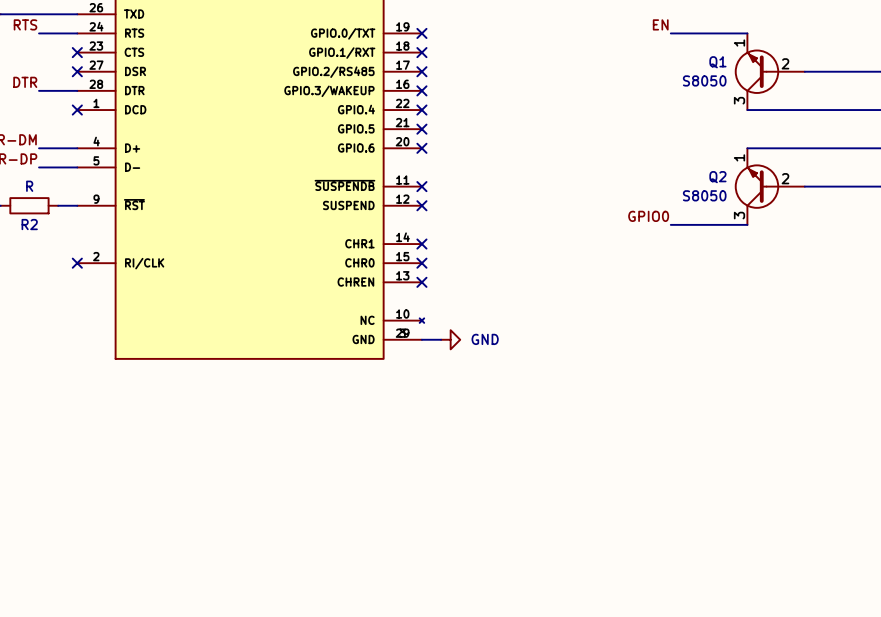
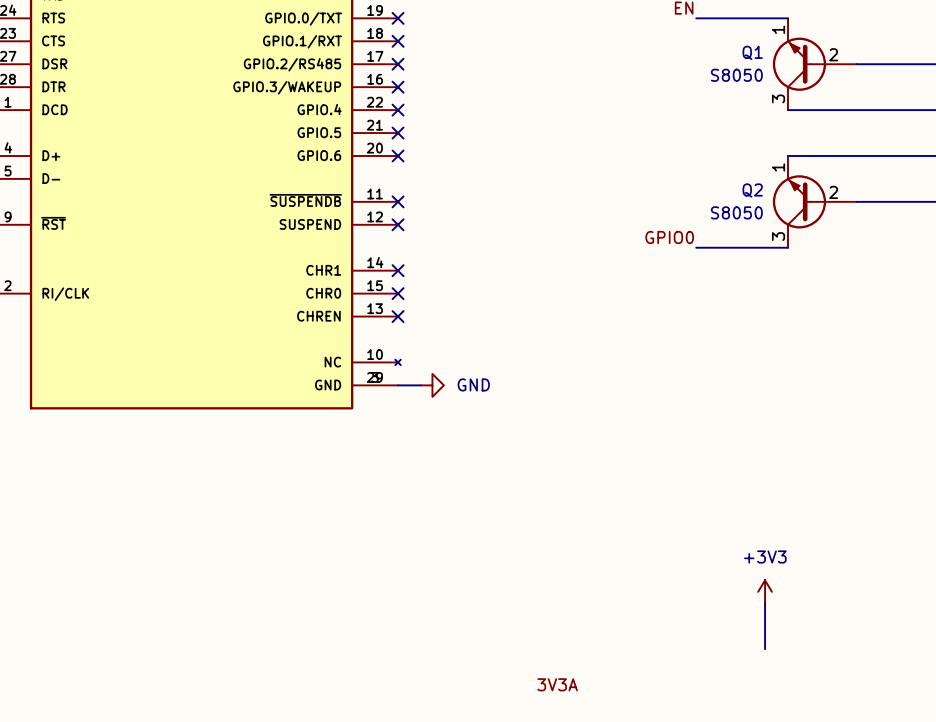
power symbol: none -> +3V3 (765, 591)
wire: none -> (765, 603) (765, 649)
label: none -> 3V3A (557, 684)

